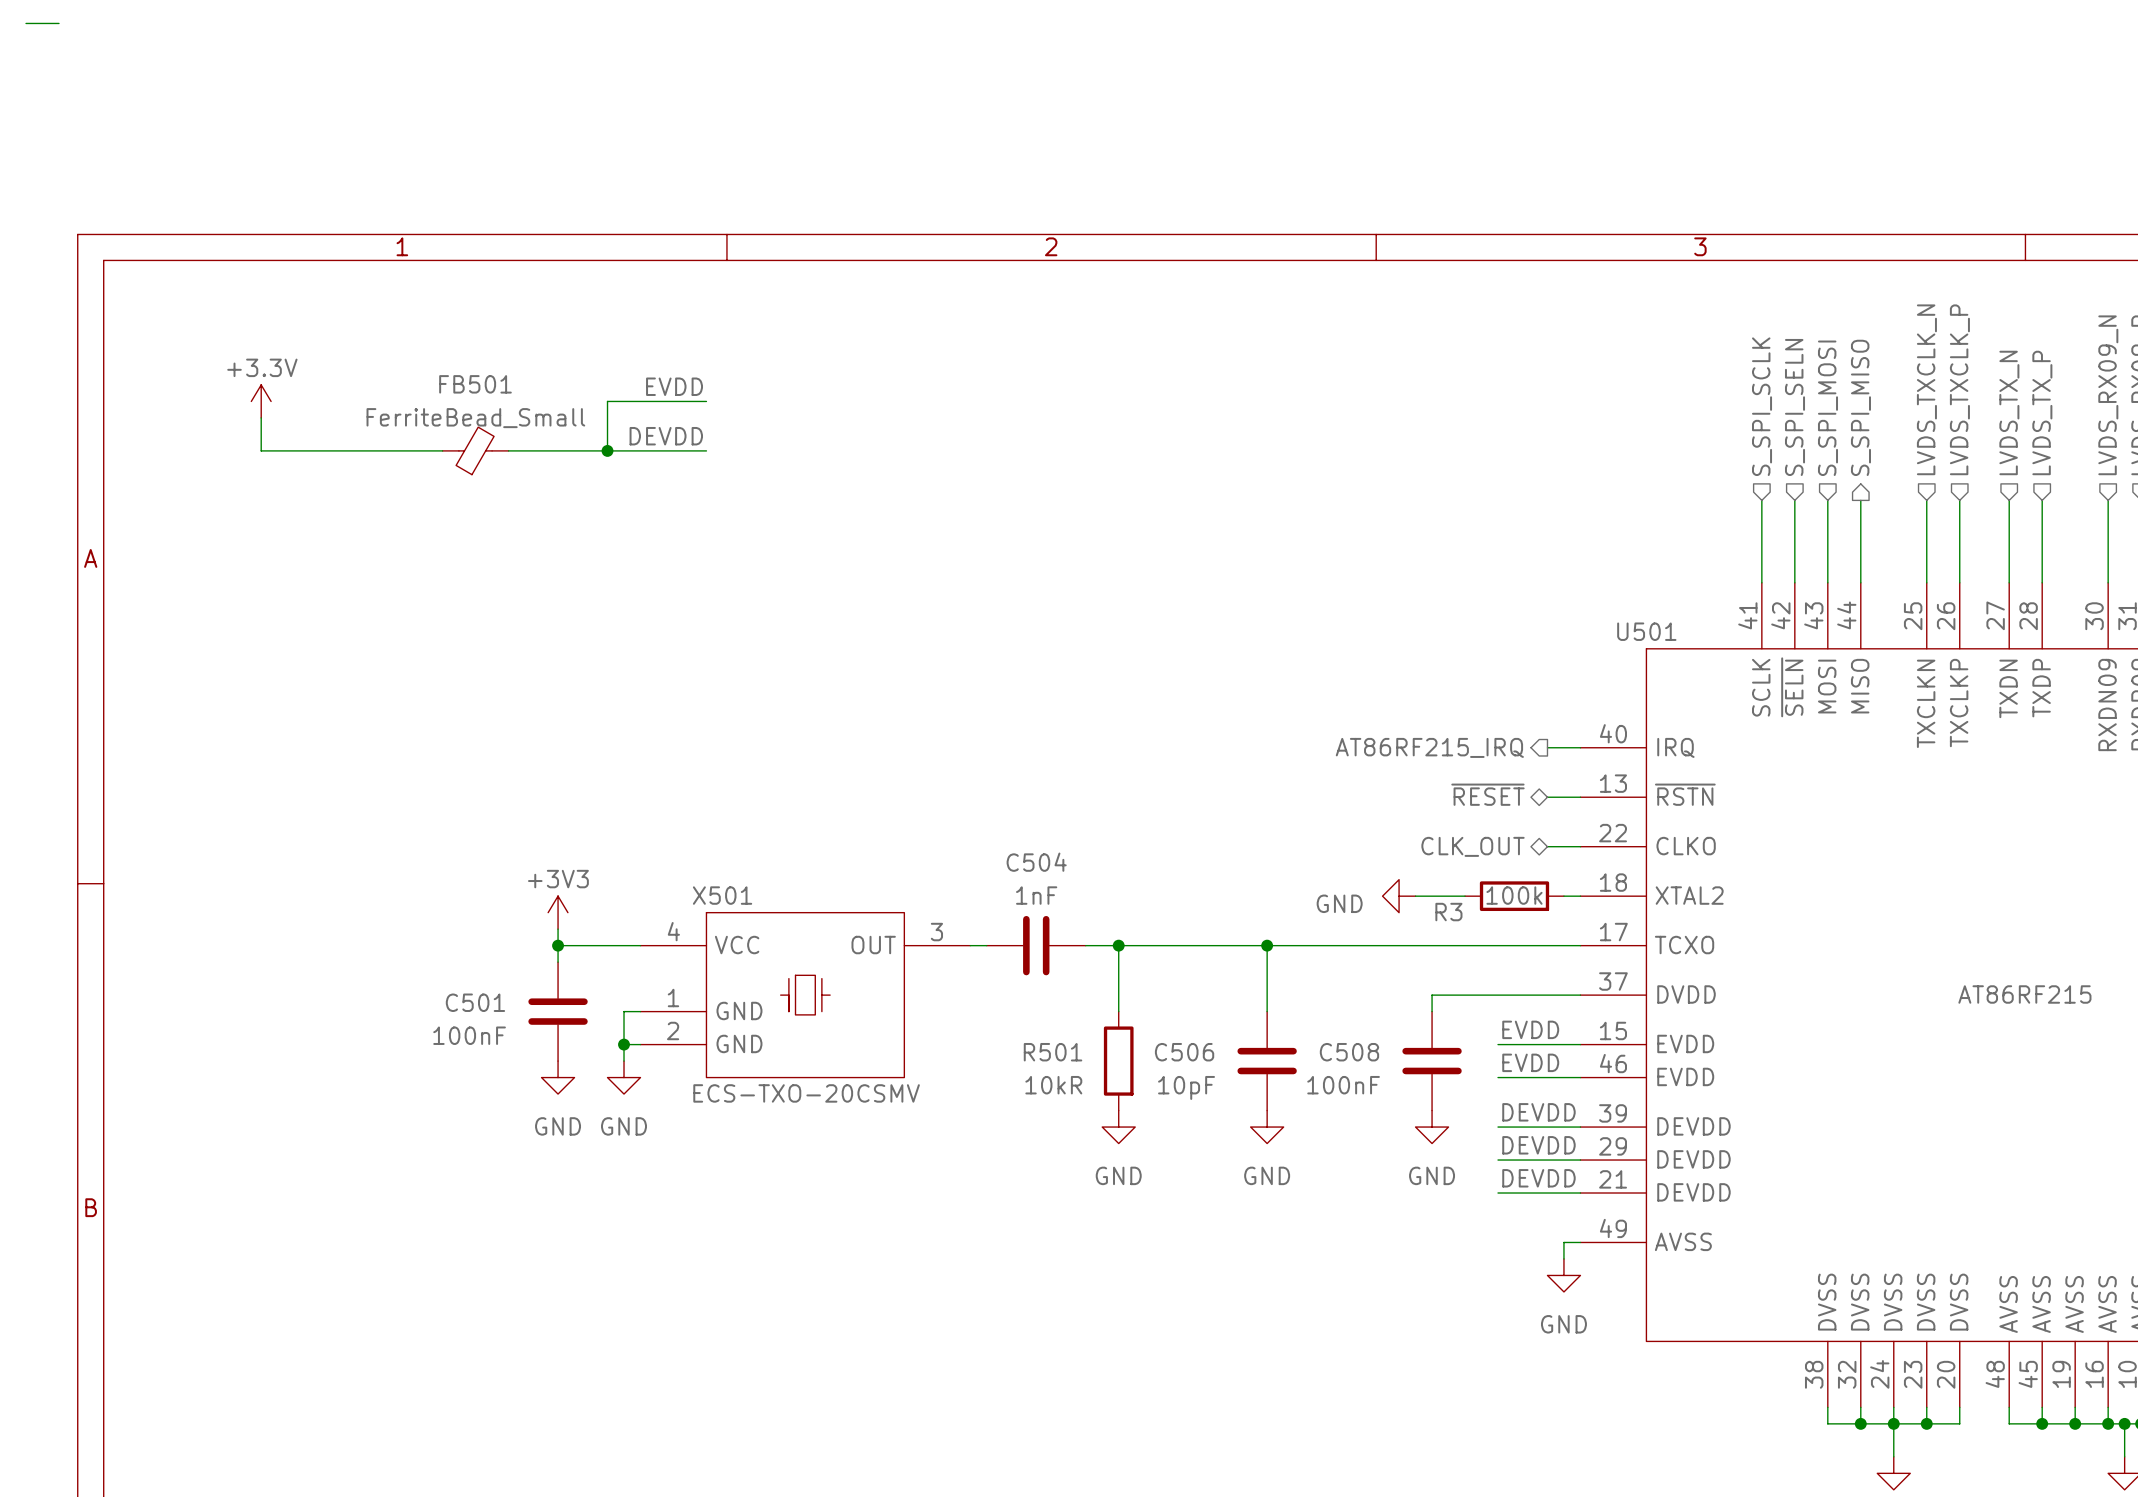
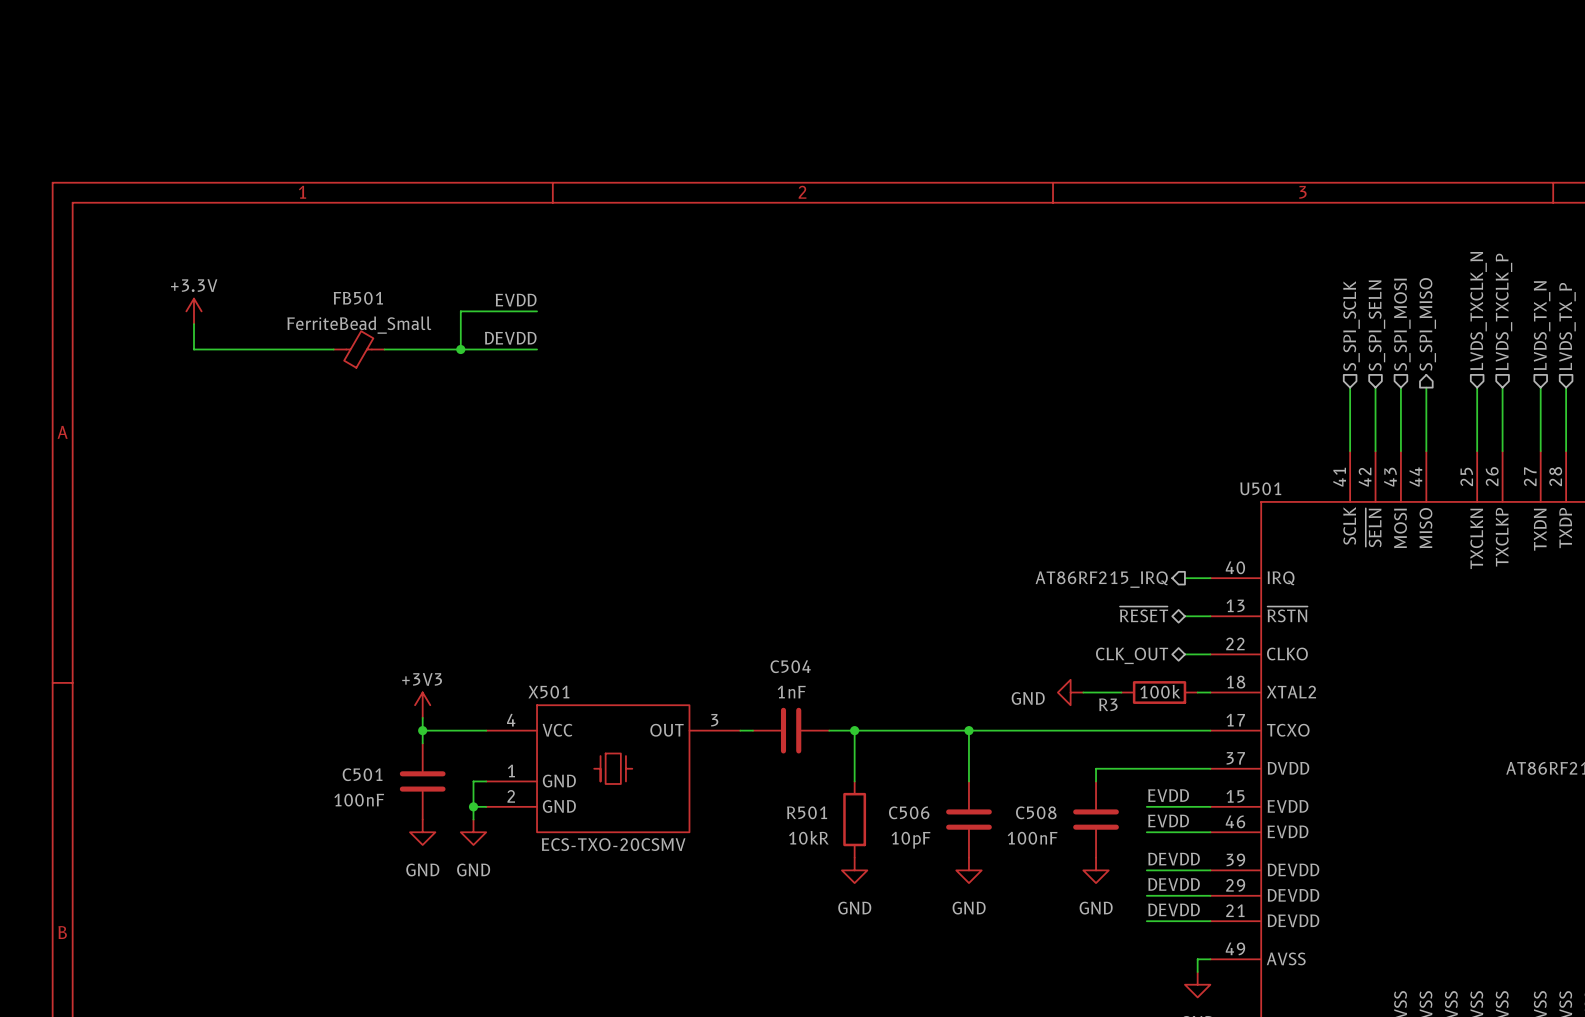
wire: (26, 23) (59, 23) -> none

